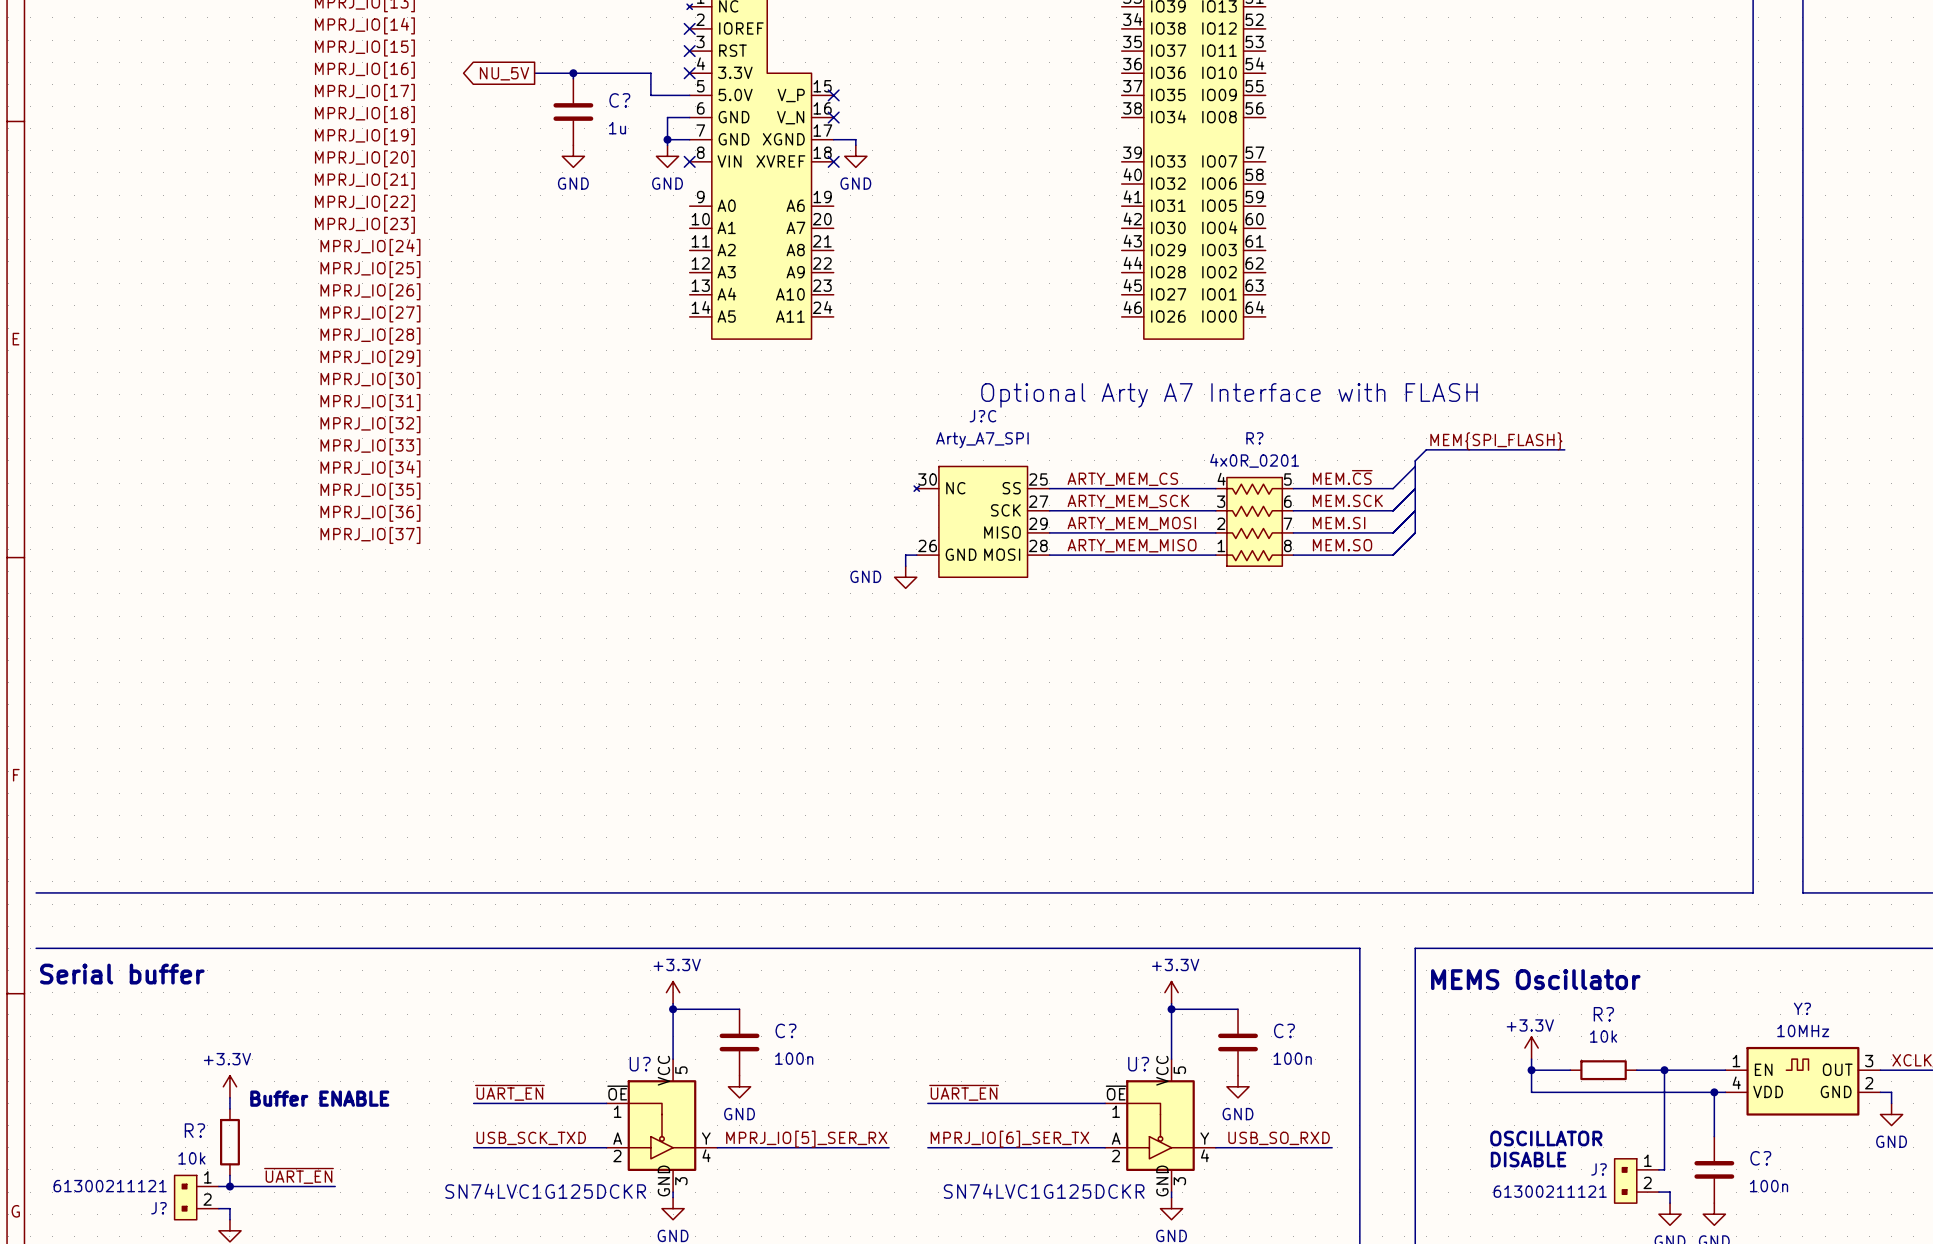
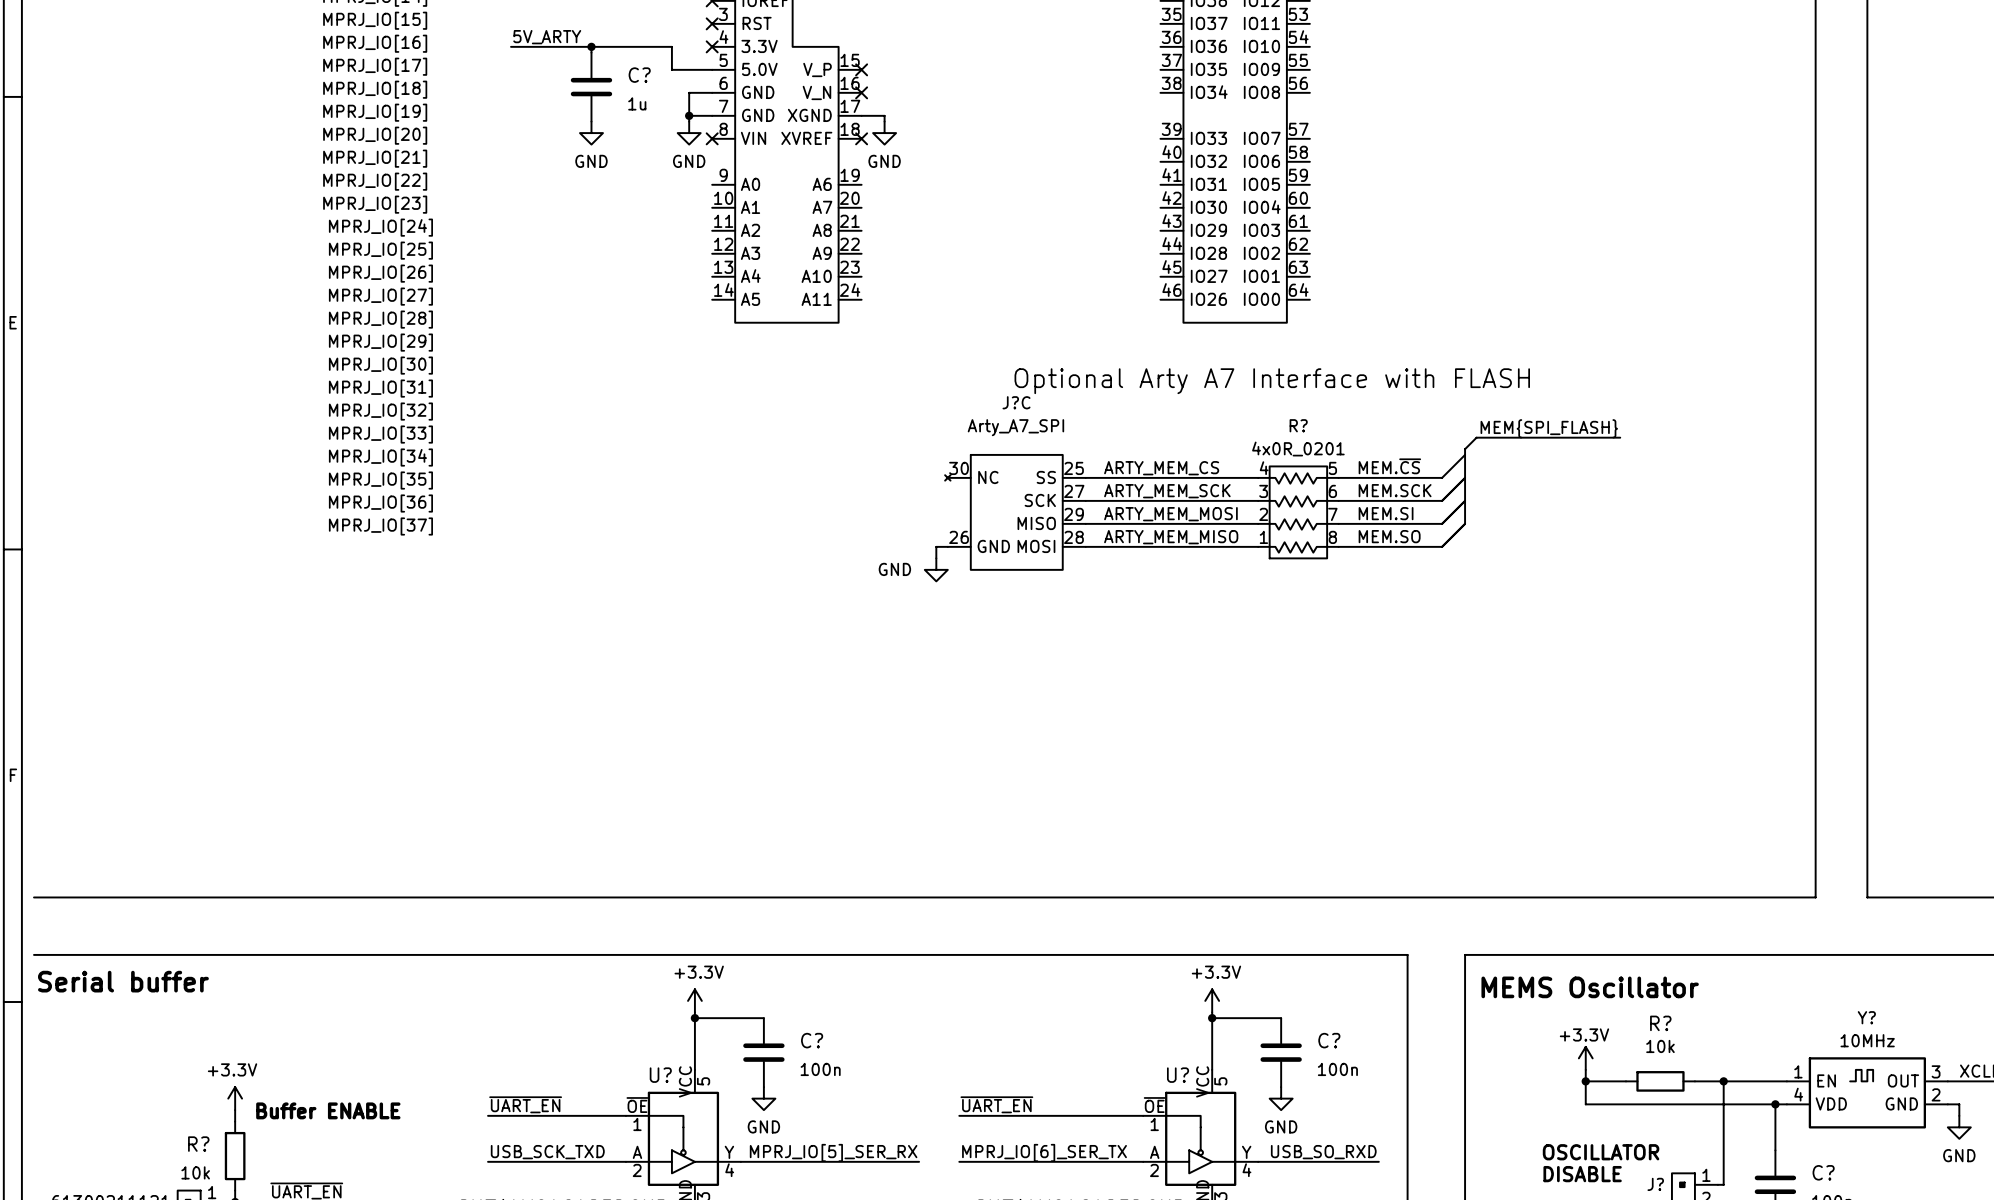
label: none -> 5V_ARTY (547, 37)
wire: none -> (511, 46) (551, 46)
global label: NU_5V (504, 73) -> none

